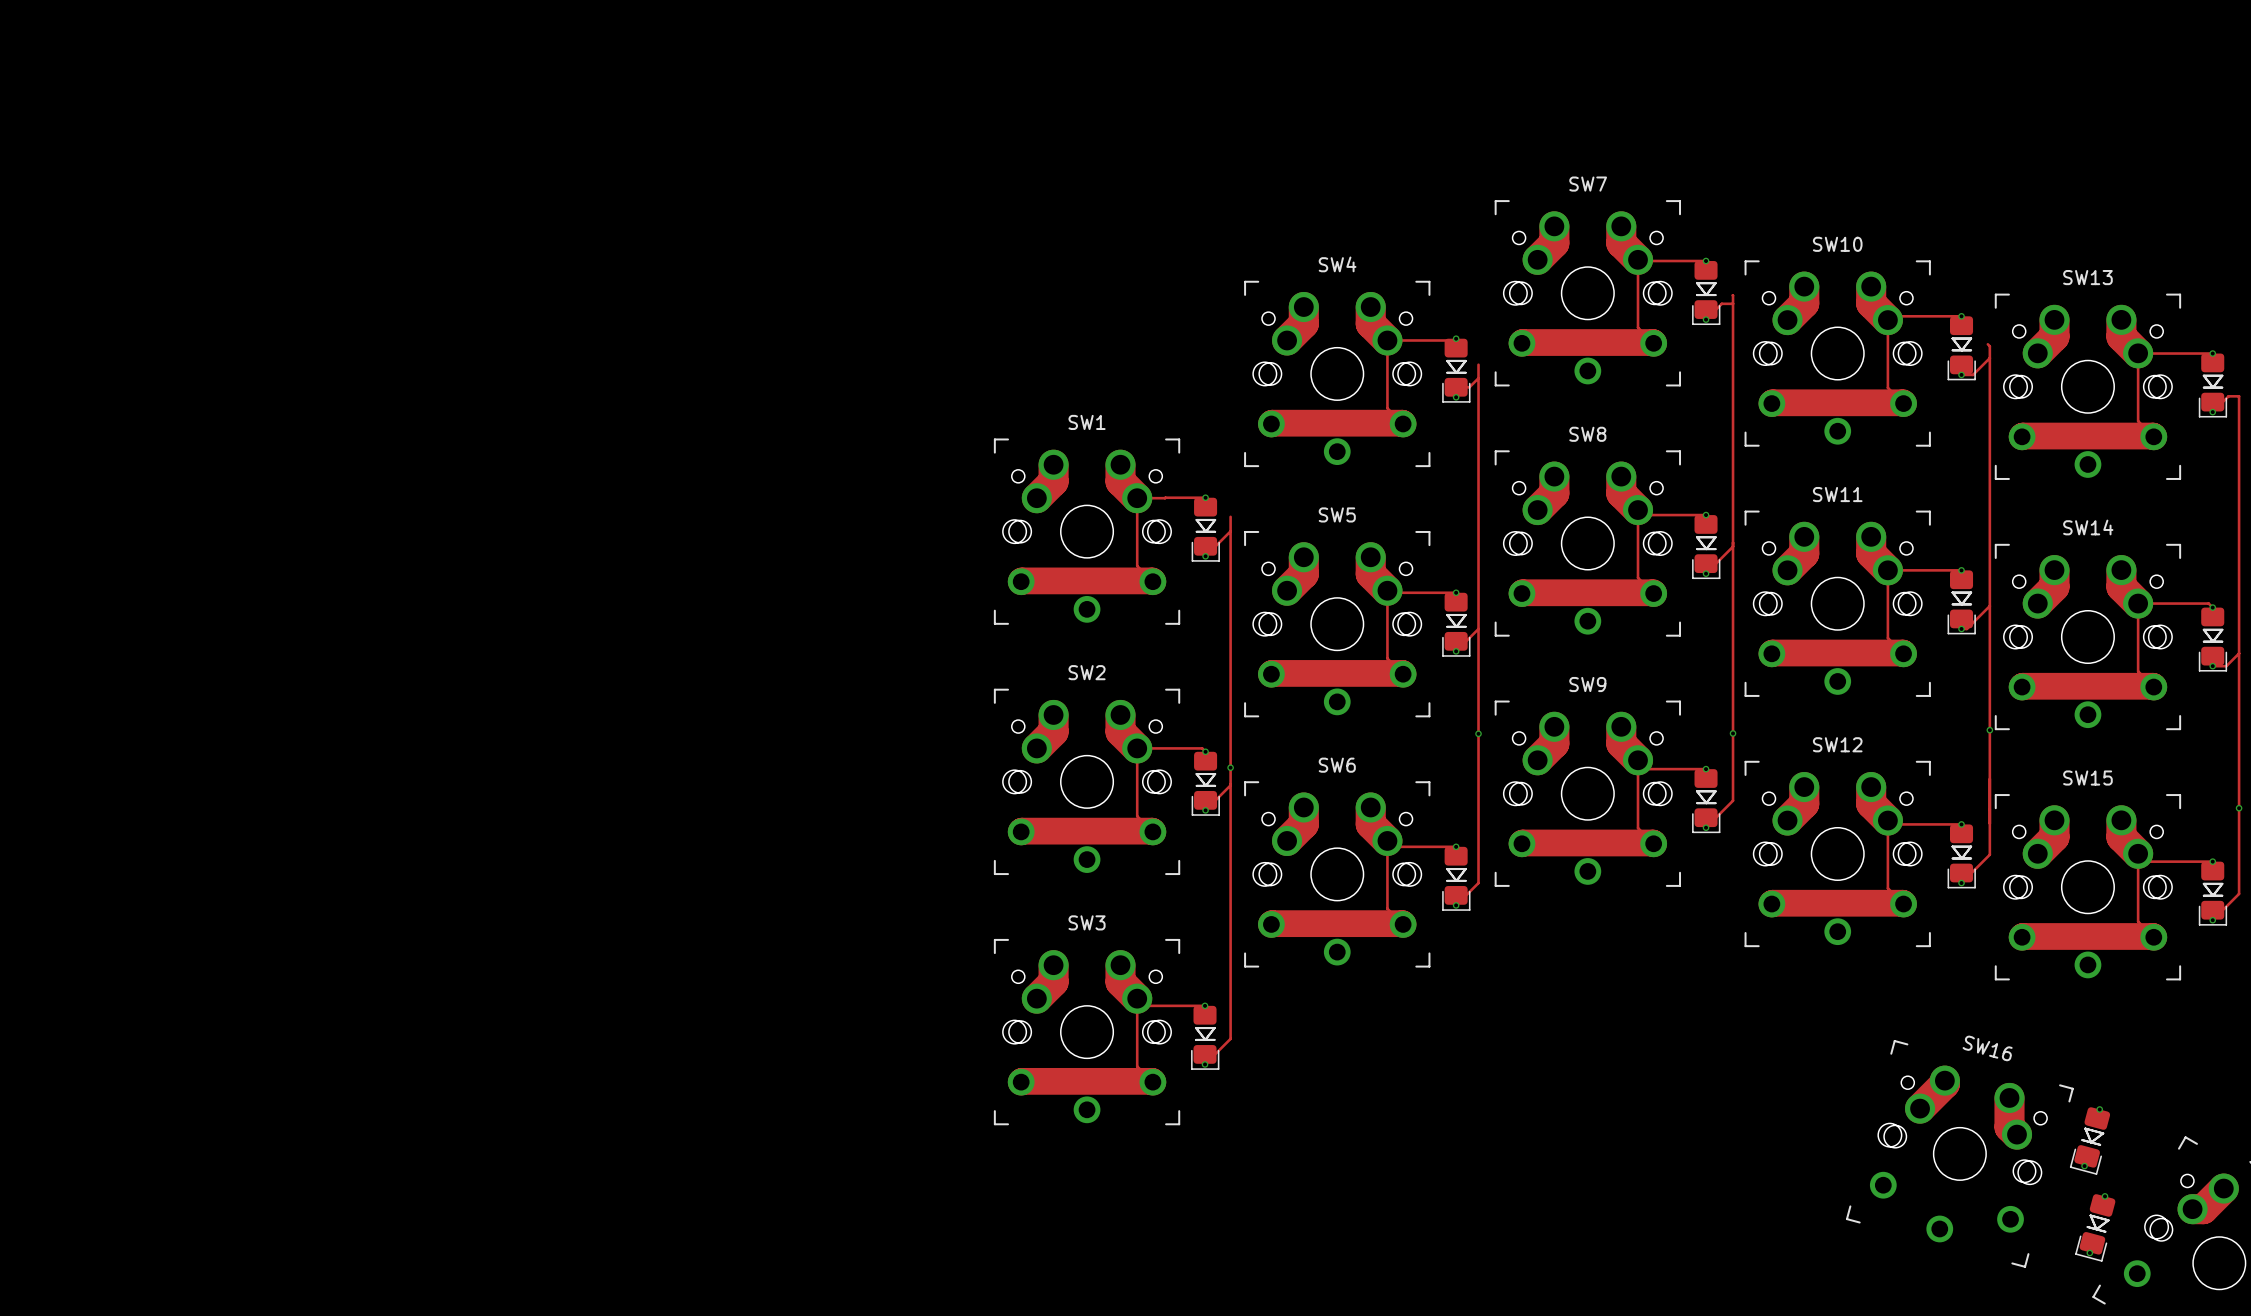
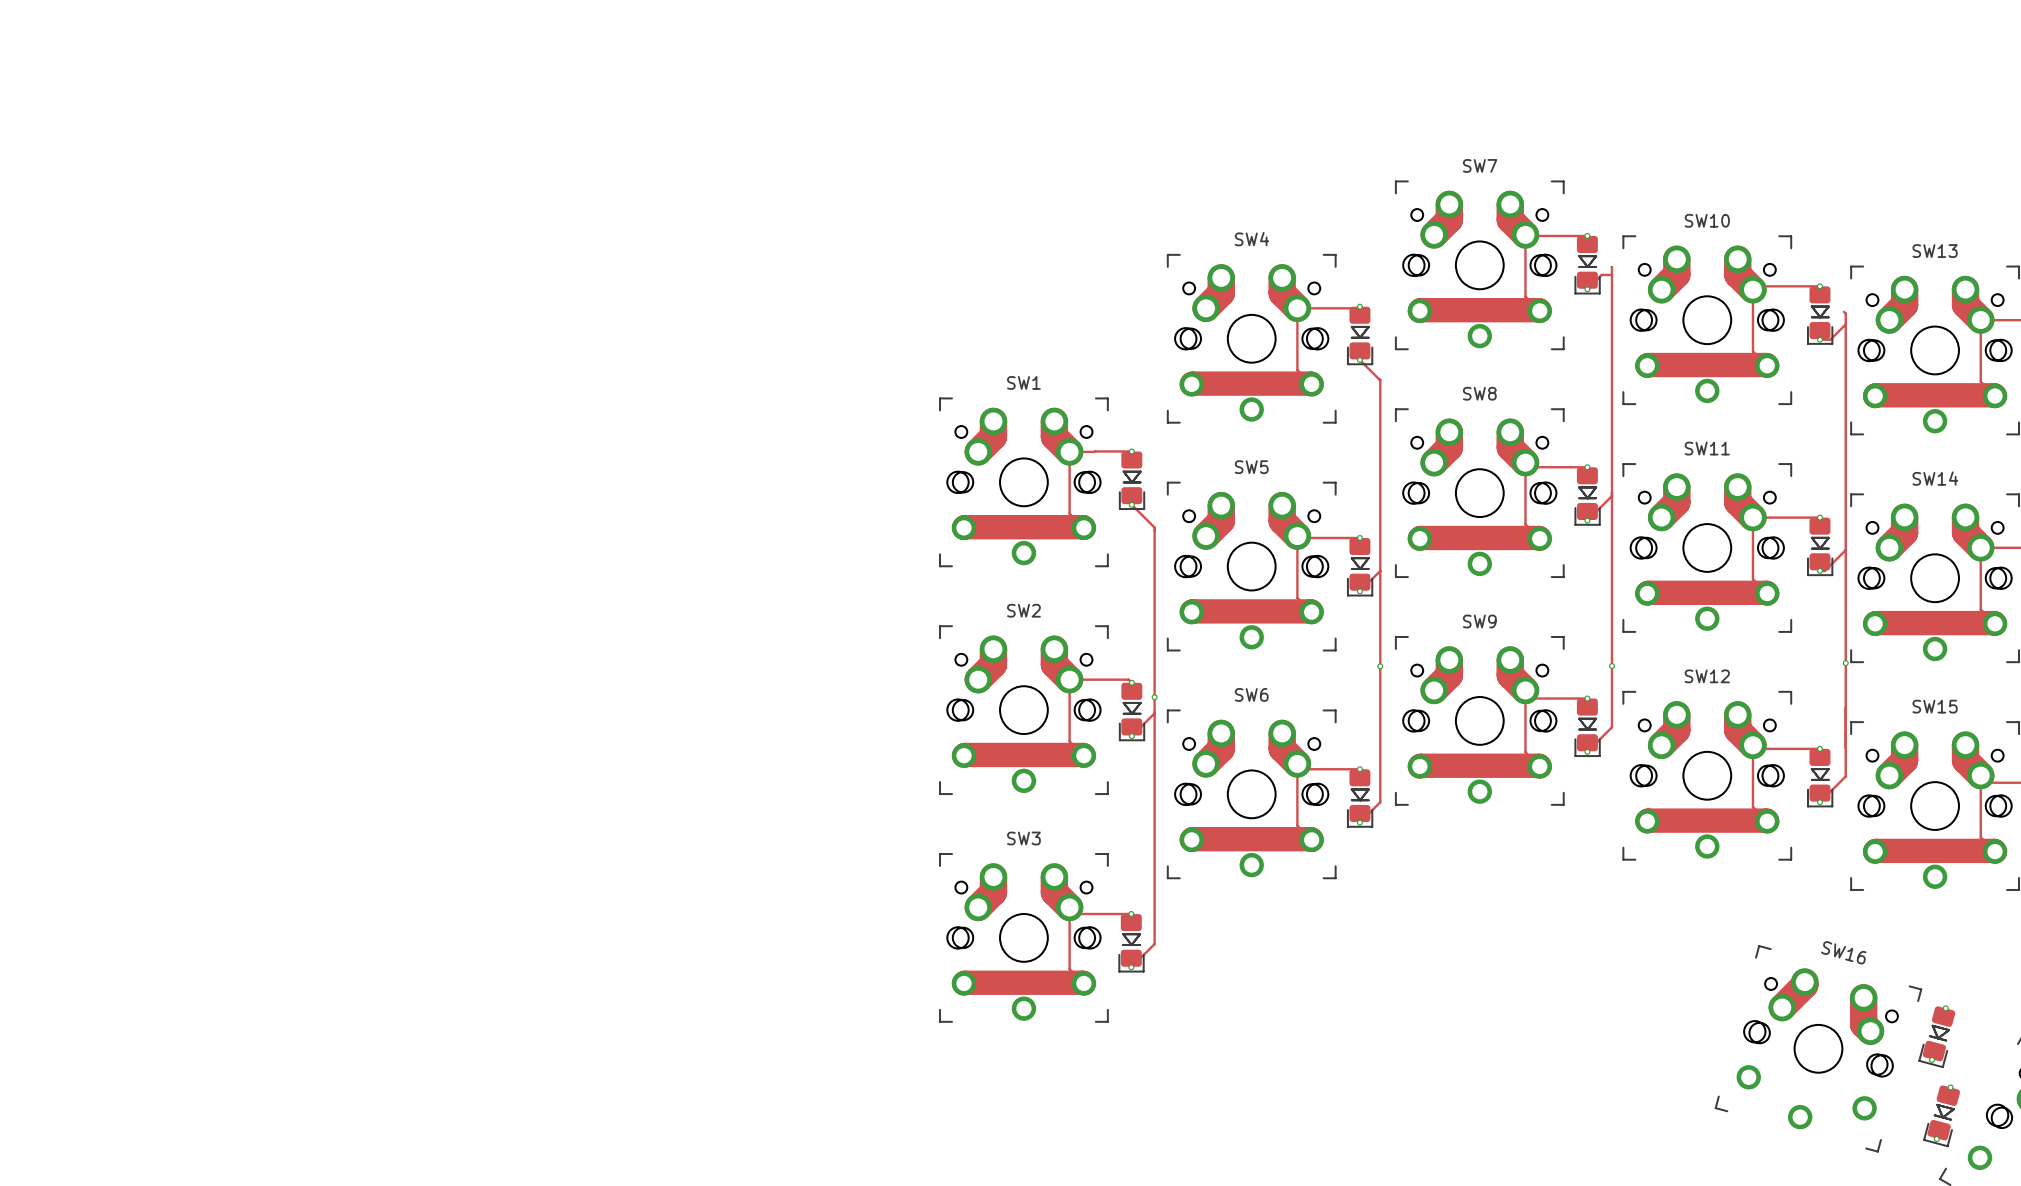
track: (1478, 364) (1478, 419) -> (1359, 360) (1380, 379)
track: (1478, 378) (1469, 387) (1456, 387) -> none
track: (1230, 516) (1230, 581) -> (1131, 504) (1154, 527)
track: (1230, 531) (1205, 556) -> none

